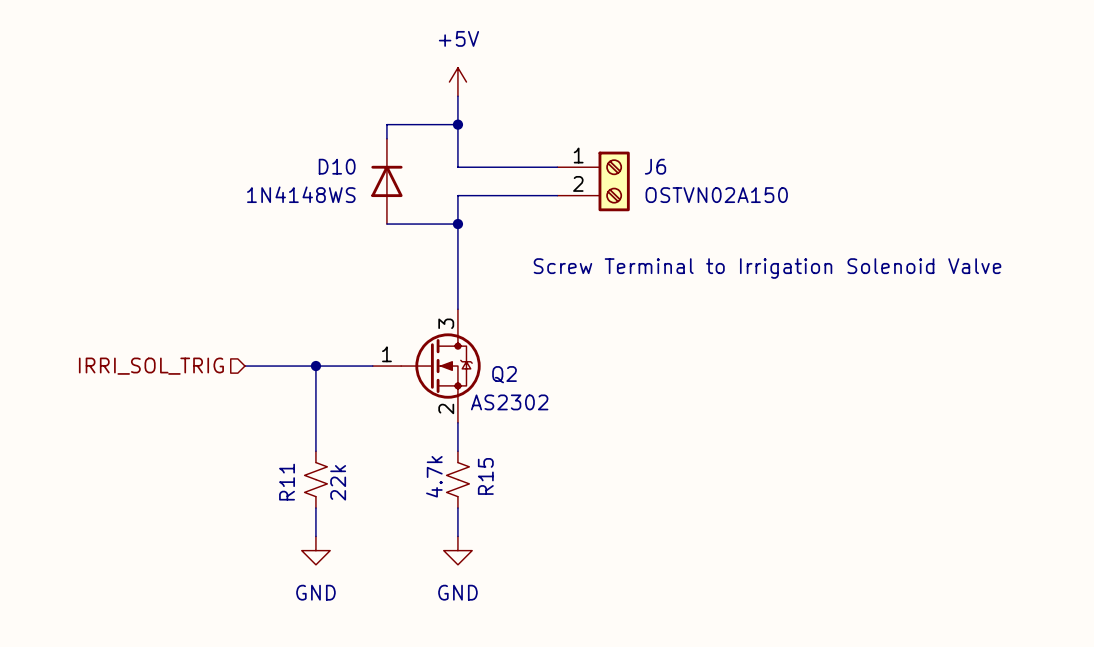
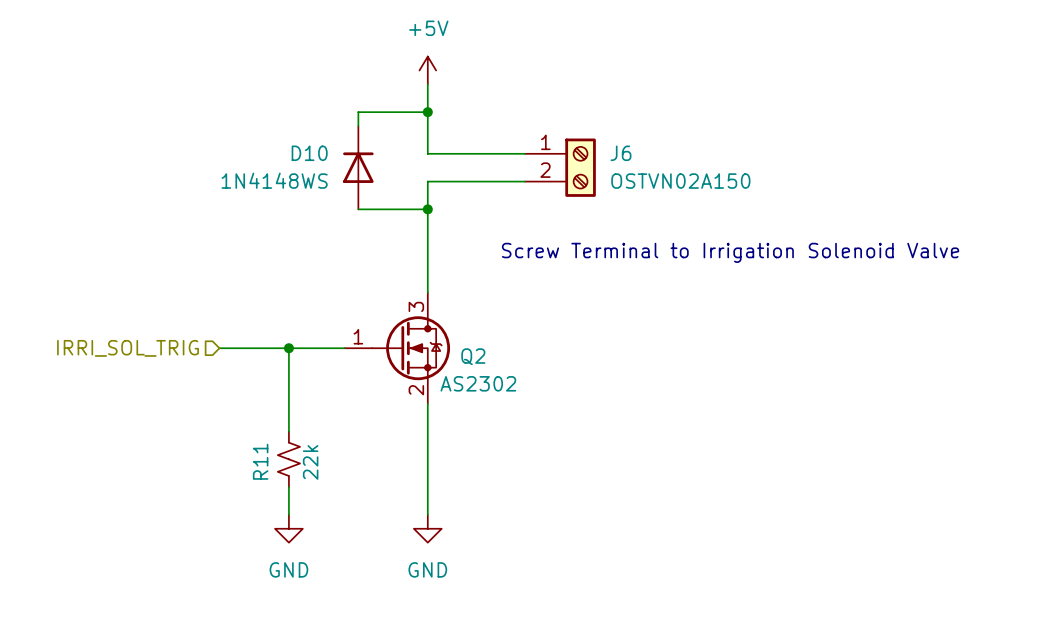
R15: 4.7k (457, 479) -> none

